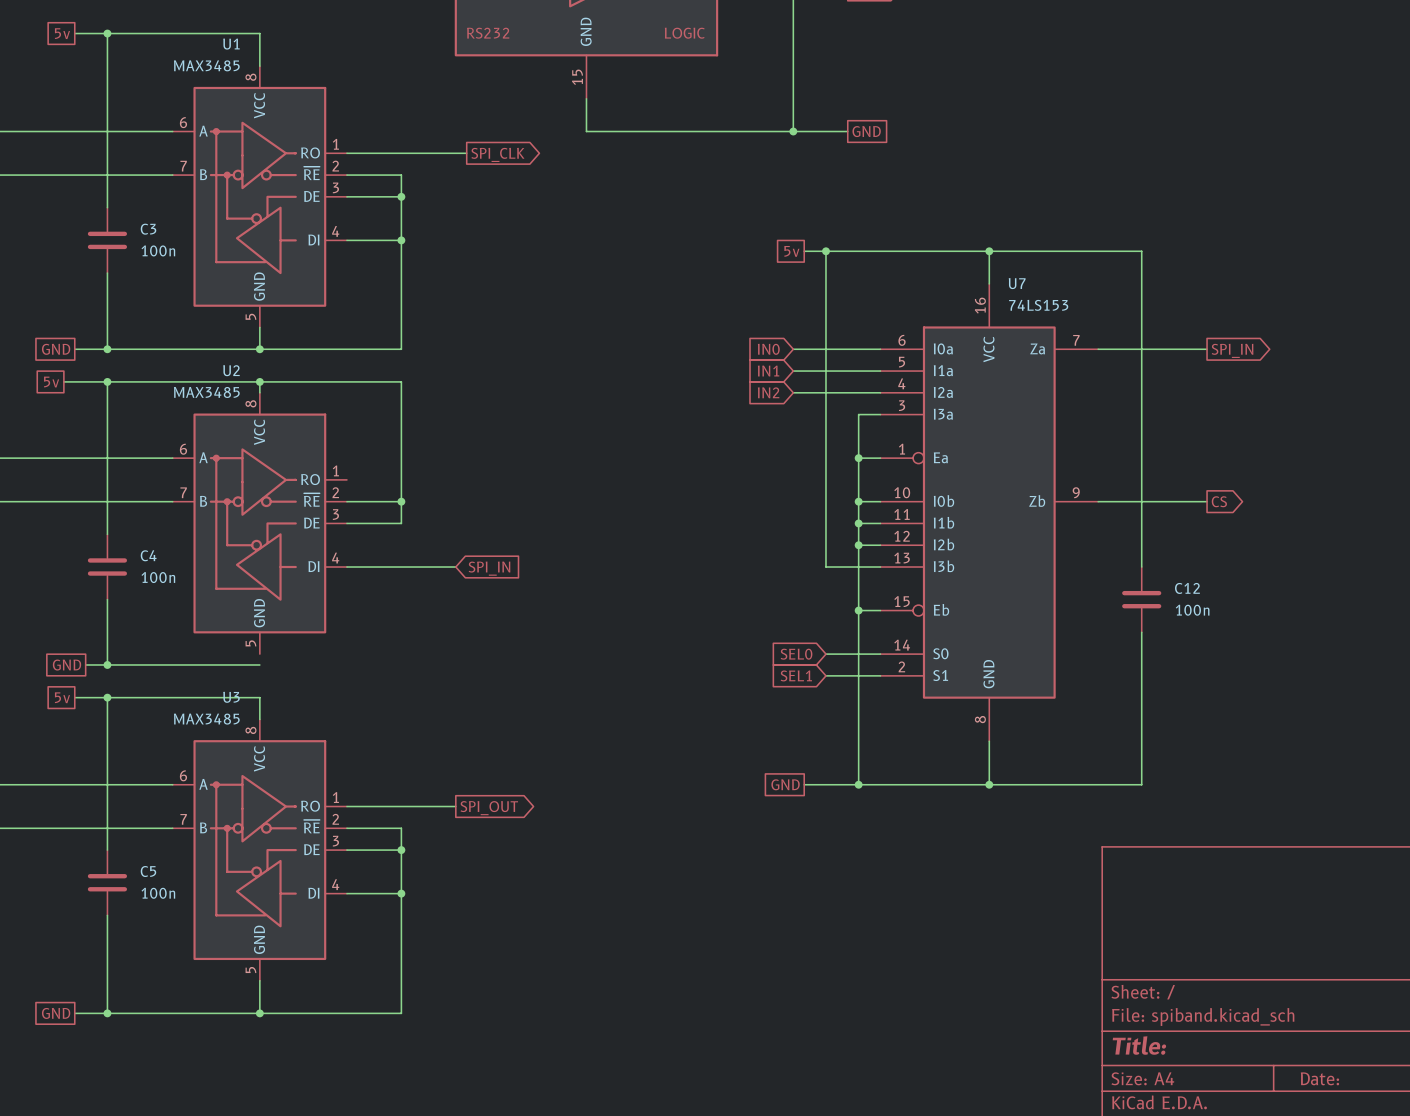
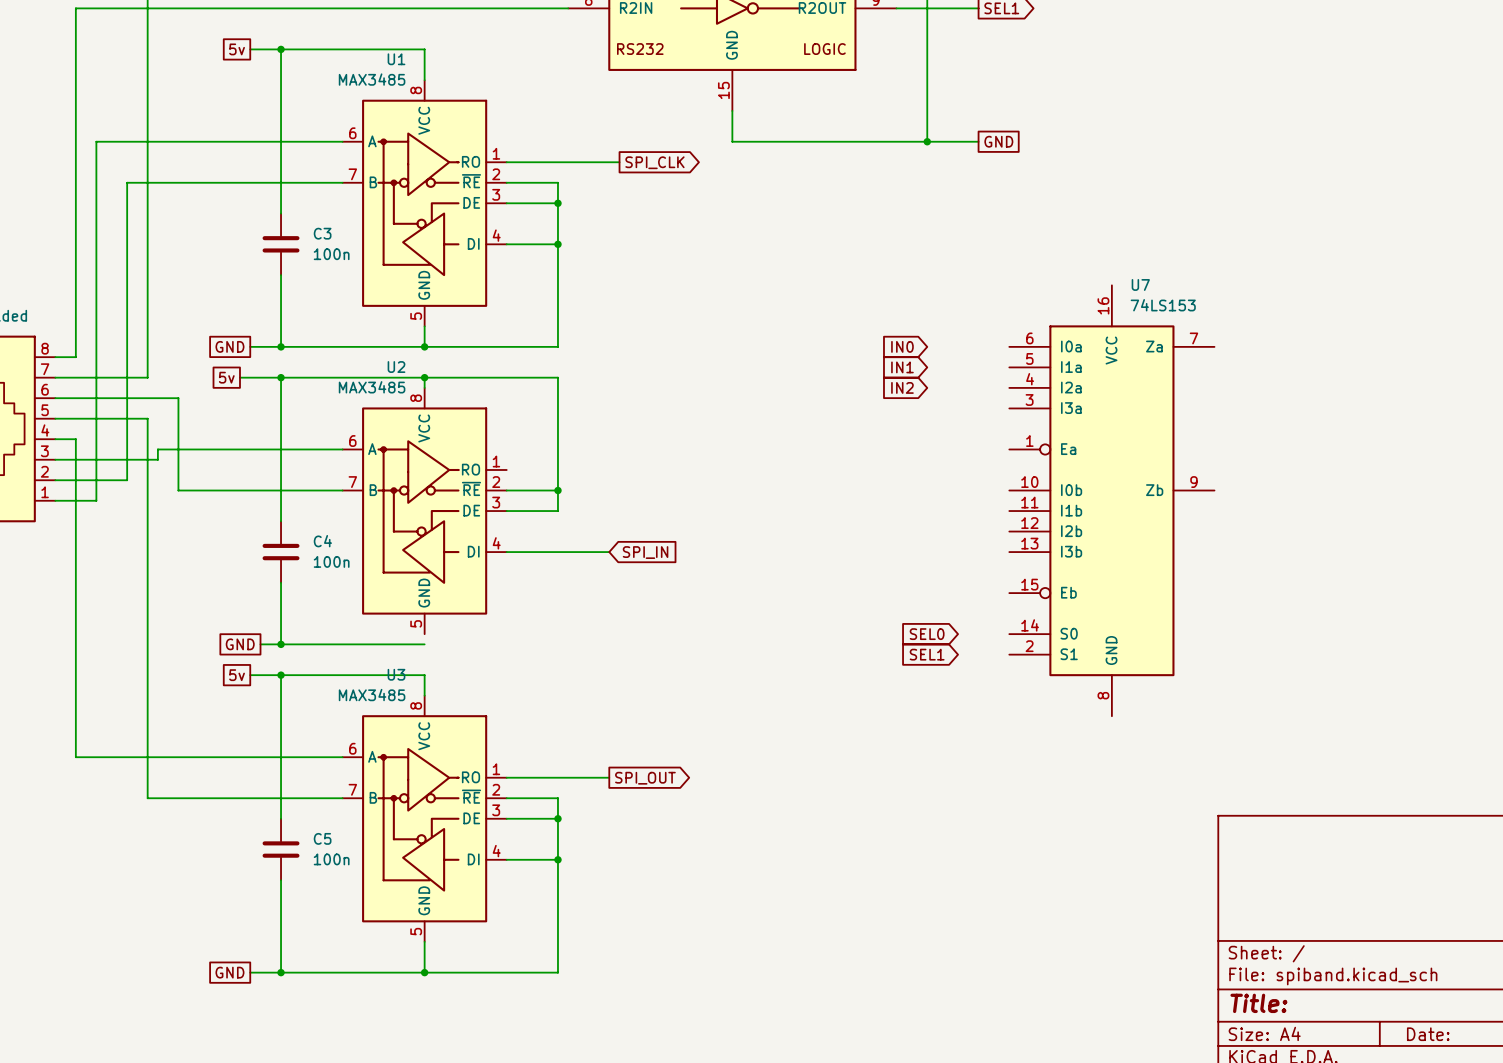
global label: 5v (791, 251) -> none
wire: (804, 251) (1141, 251) (1141, 567) -> none
wire: (825, 251) (825, 567) (880, 567) -> none
junction: (825, 251) -> none
wire: (989, 251) (989, 283) -> none
junction: (989, 251) -> none
wire: (793, 349) (880, 349) -> none
wire: (1098, 349) (1207, 349) -> none
global label: SPI_IN (1232, 350) -> none
wire: (793, 371) (880, 371) -> none
wire: (793, 392) (880, 392) -> none
wire: (880, 414) (858, 414) (858, 784) -> none
wire: (858, 458) (880, 458) -> none
junction: (858, 458) -> none
wire: (858, 501) (880, 501) -> none
junction: (858, 501) -> none
wire: (1098, 501) (1207, 501) -> none
global label: CS (1219, 501) -> none
wire: (858, 523) (880, 523) -> none
junction: (858, 523) -> none
wire: (858, 545) (880, 545) -> none
junction: (858, 545) -> none
C12: 100n (1141, 599) -> none
wire: (858, 610) (880, 610) -> none
junction: (858, 610) -> none
wire: (1141, 632) (1141, 784) (804, 784) -> none
wire: (825, 654) (880, 654) -> none
wire: (825, 675) (880, 675) -> none
wire: (989, 741) (989, 784) -> none
global label: GND (785, 784) -> none
junction: (858, 784) -> none
junction: (989, 784) -> none

